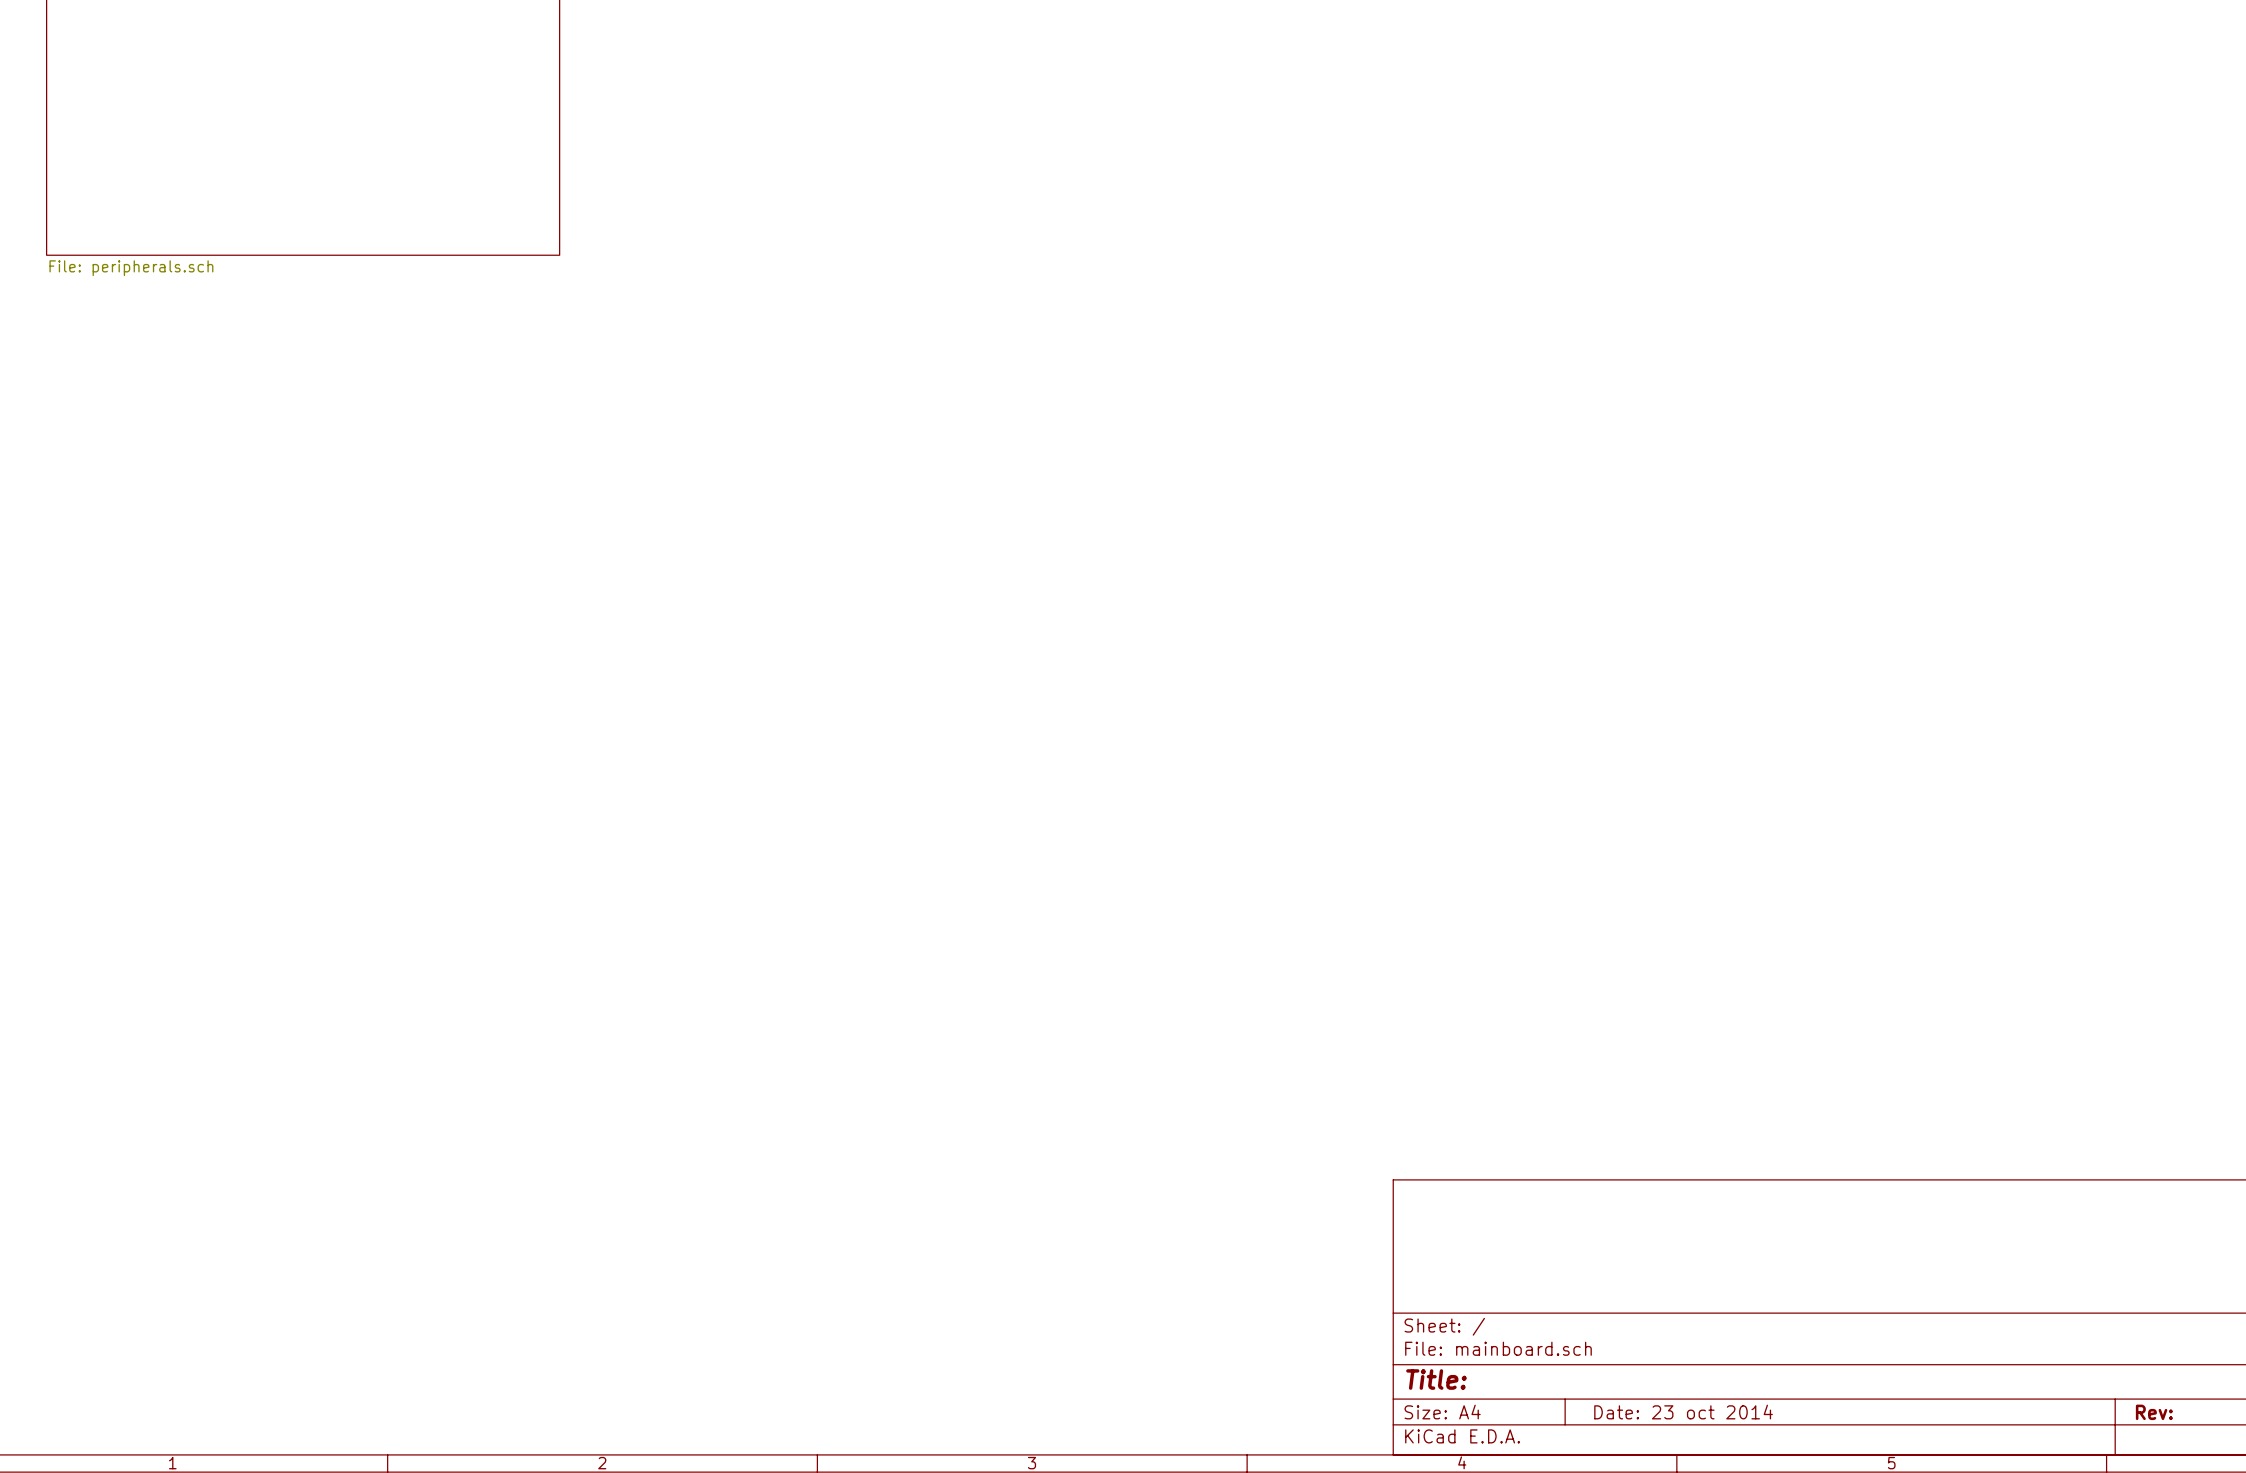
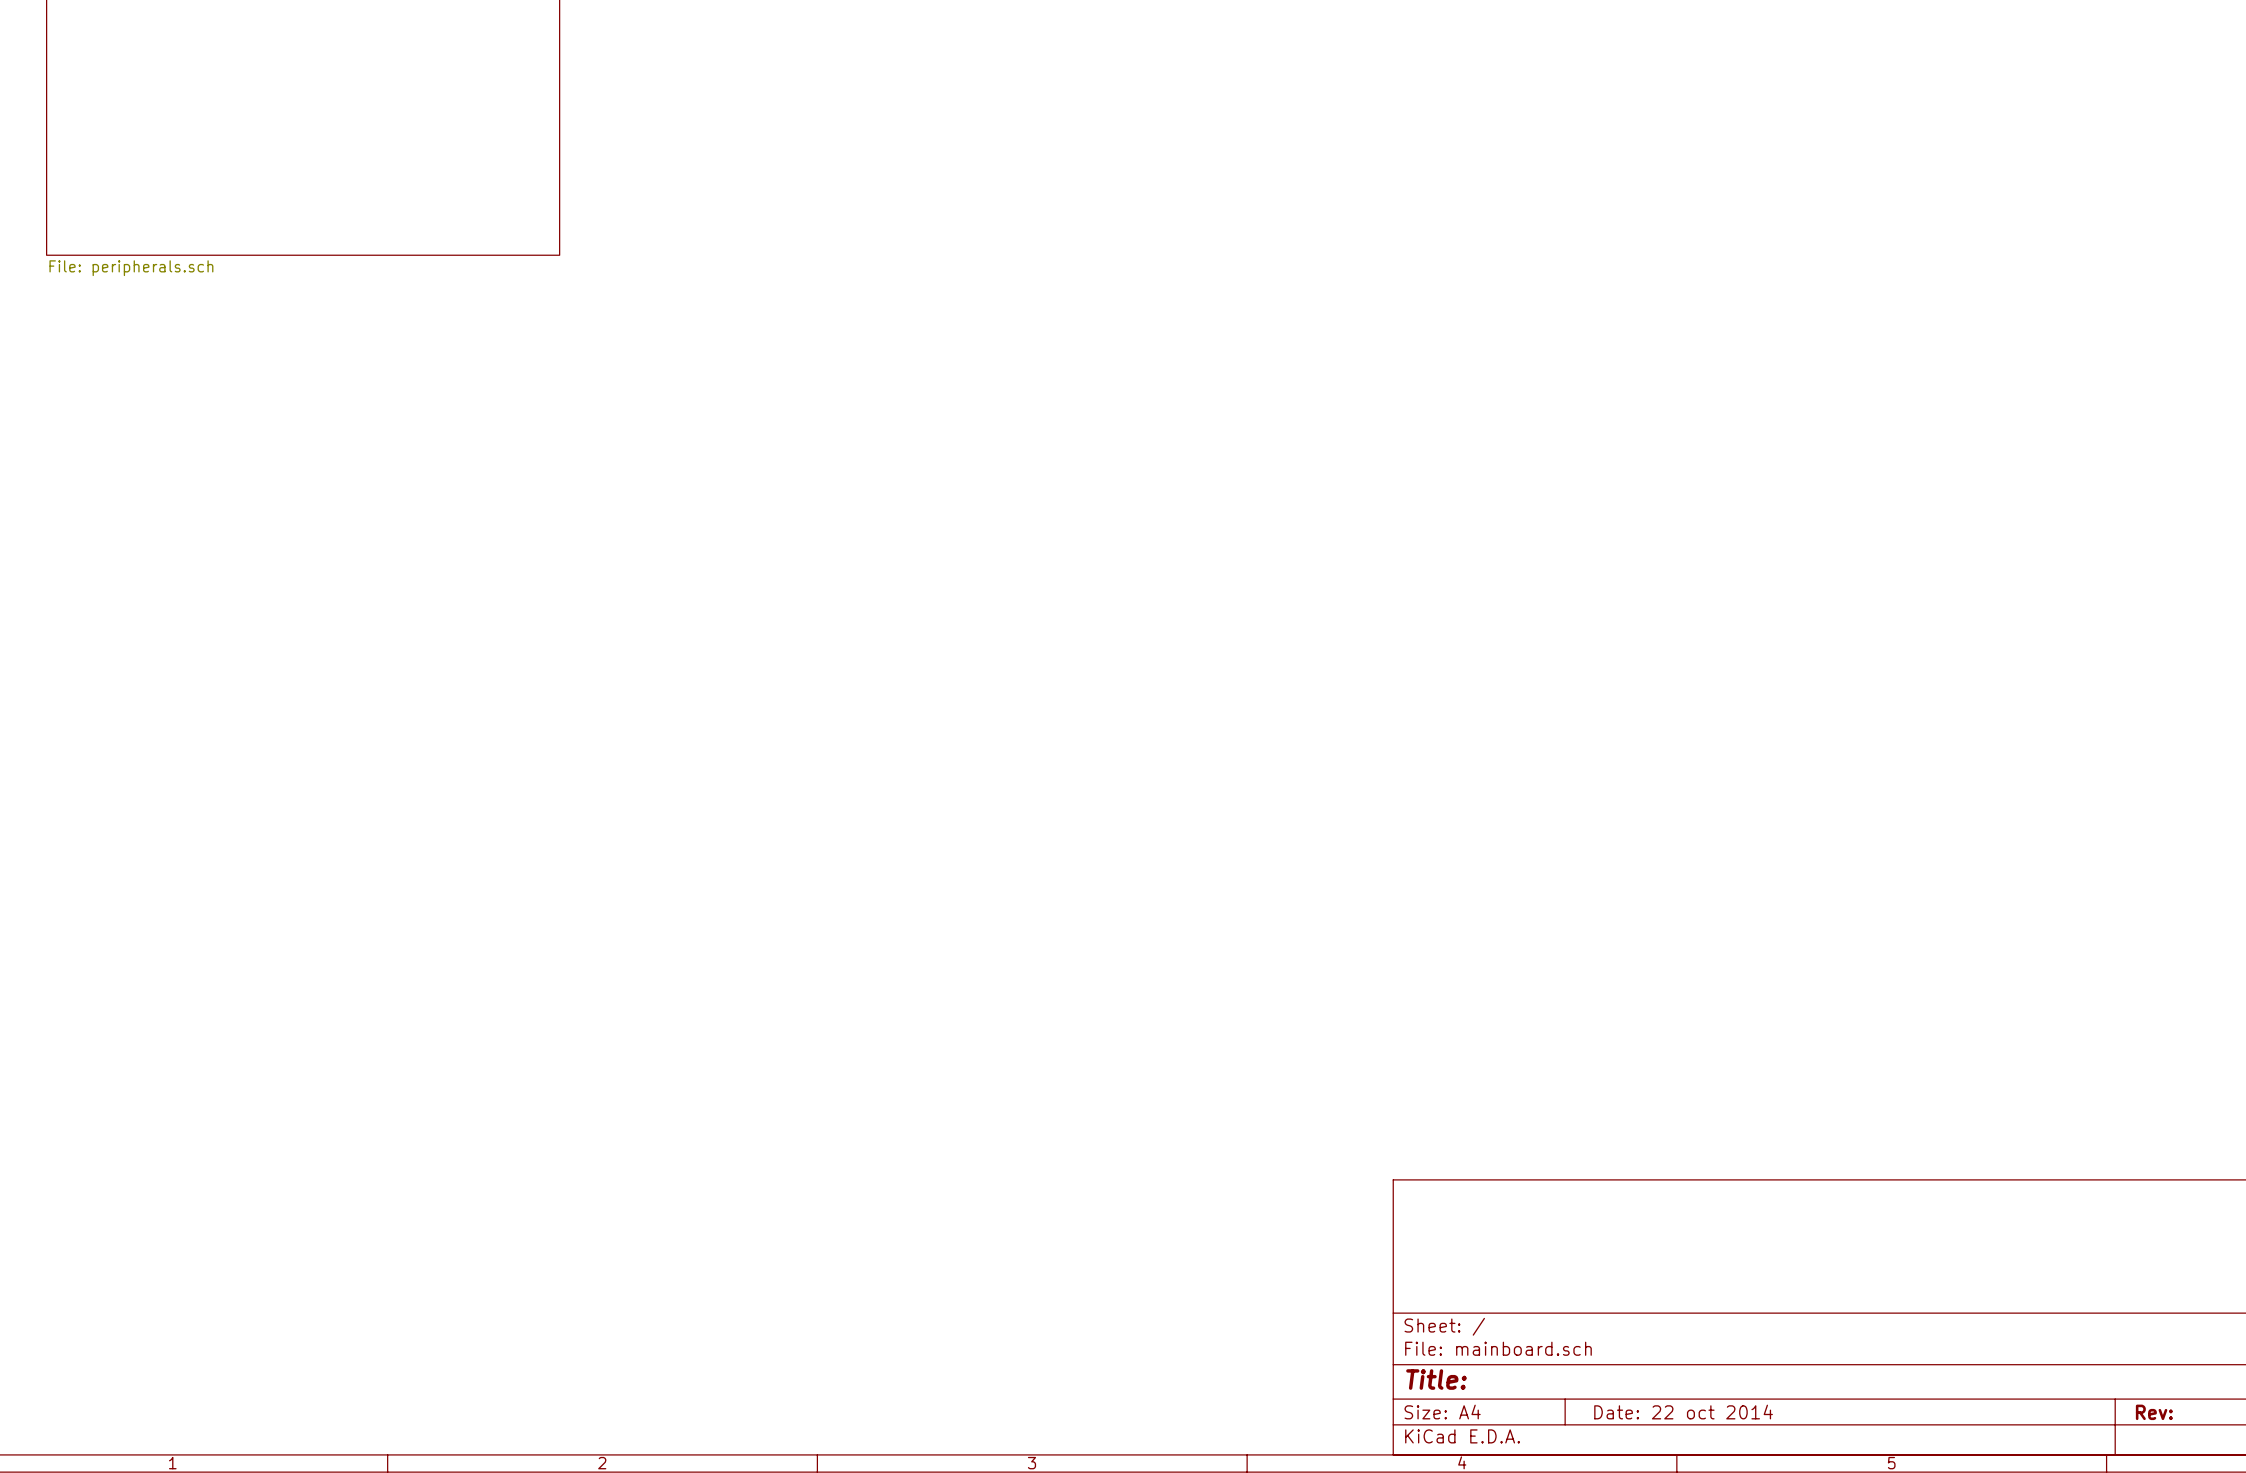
title block: Date: 23 oct 2014 (1683, 1412) -> Date: 22 oct 2014 (1683, 1412)

